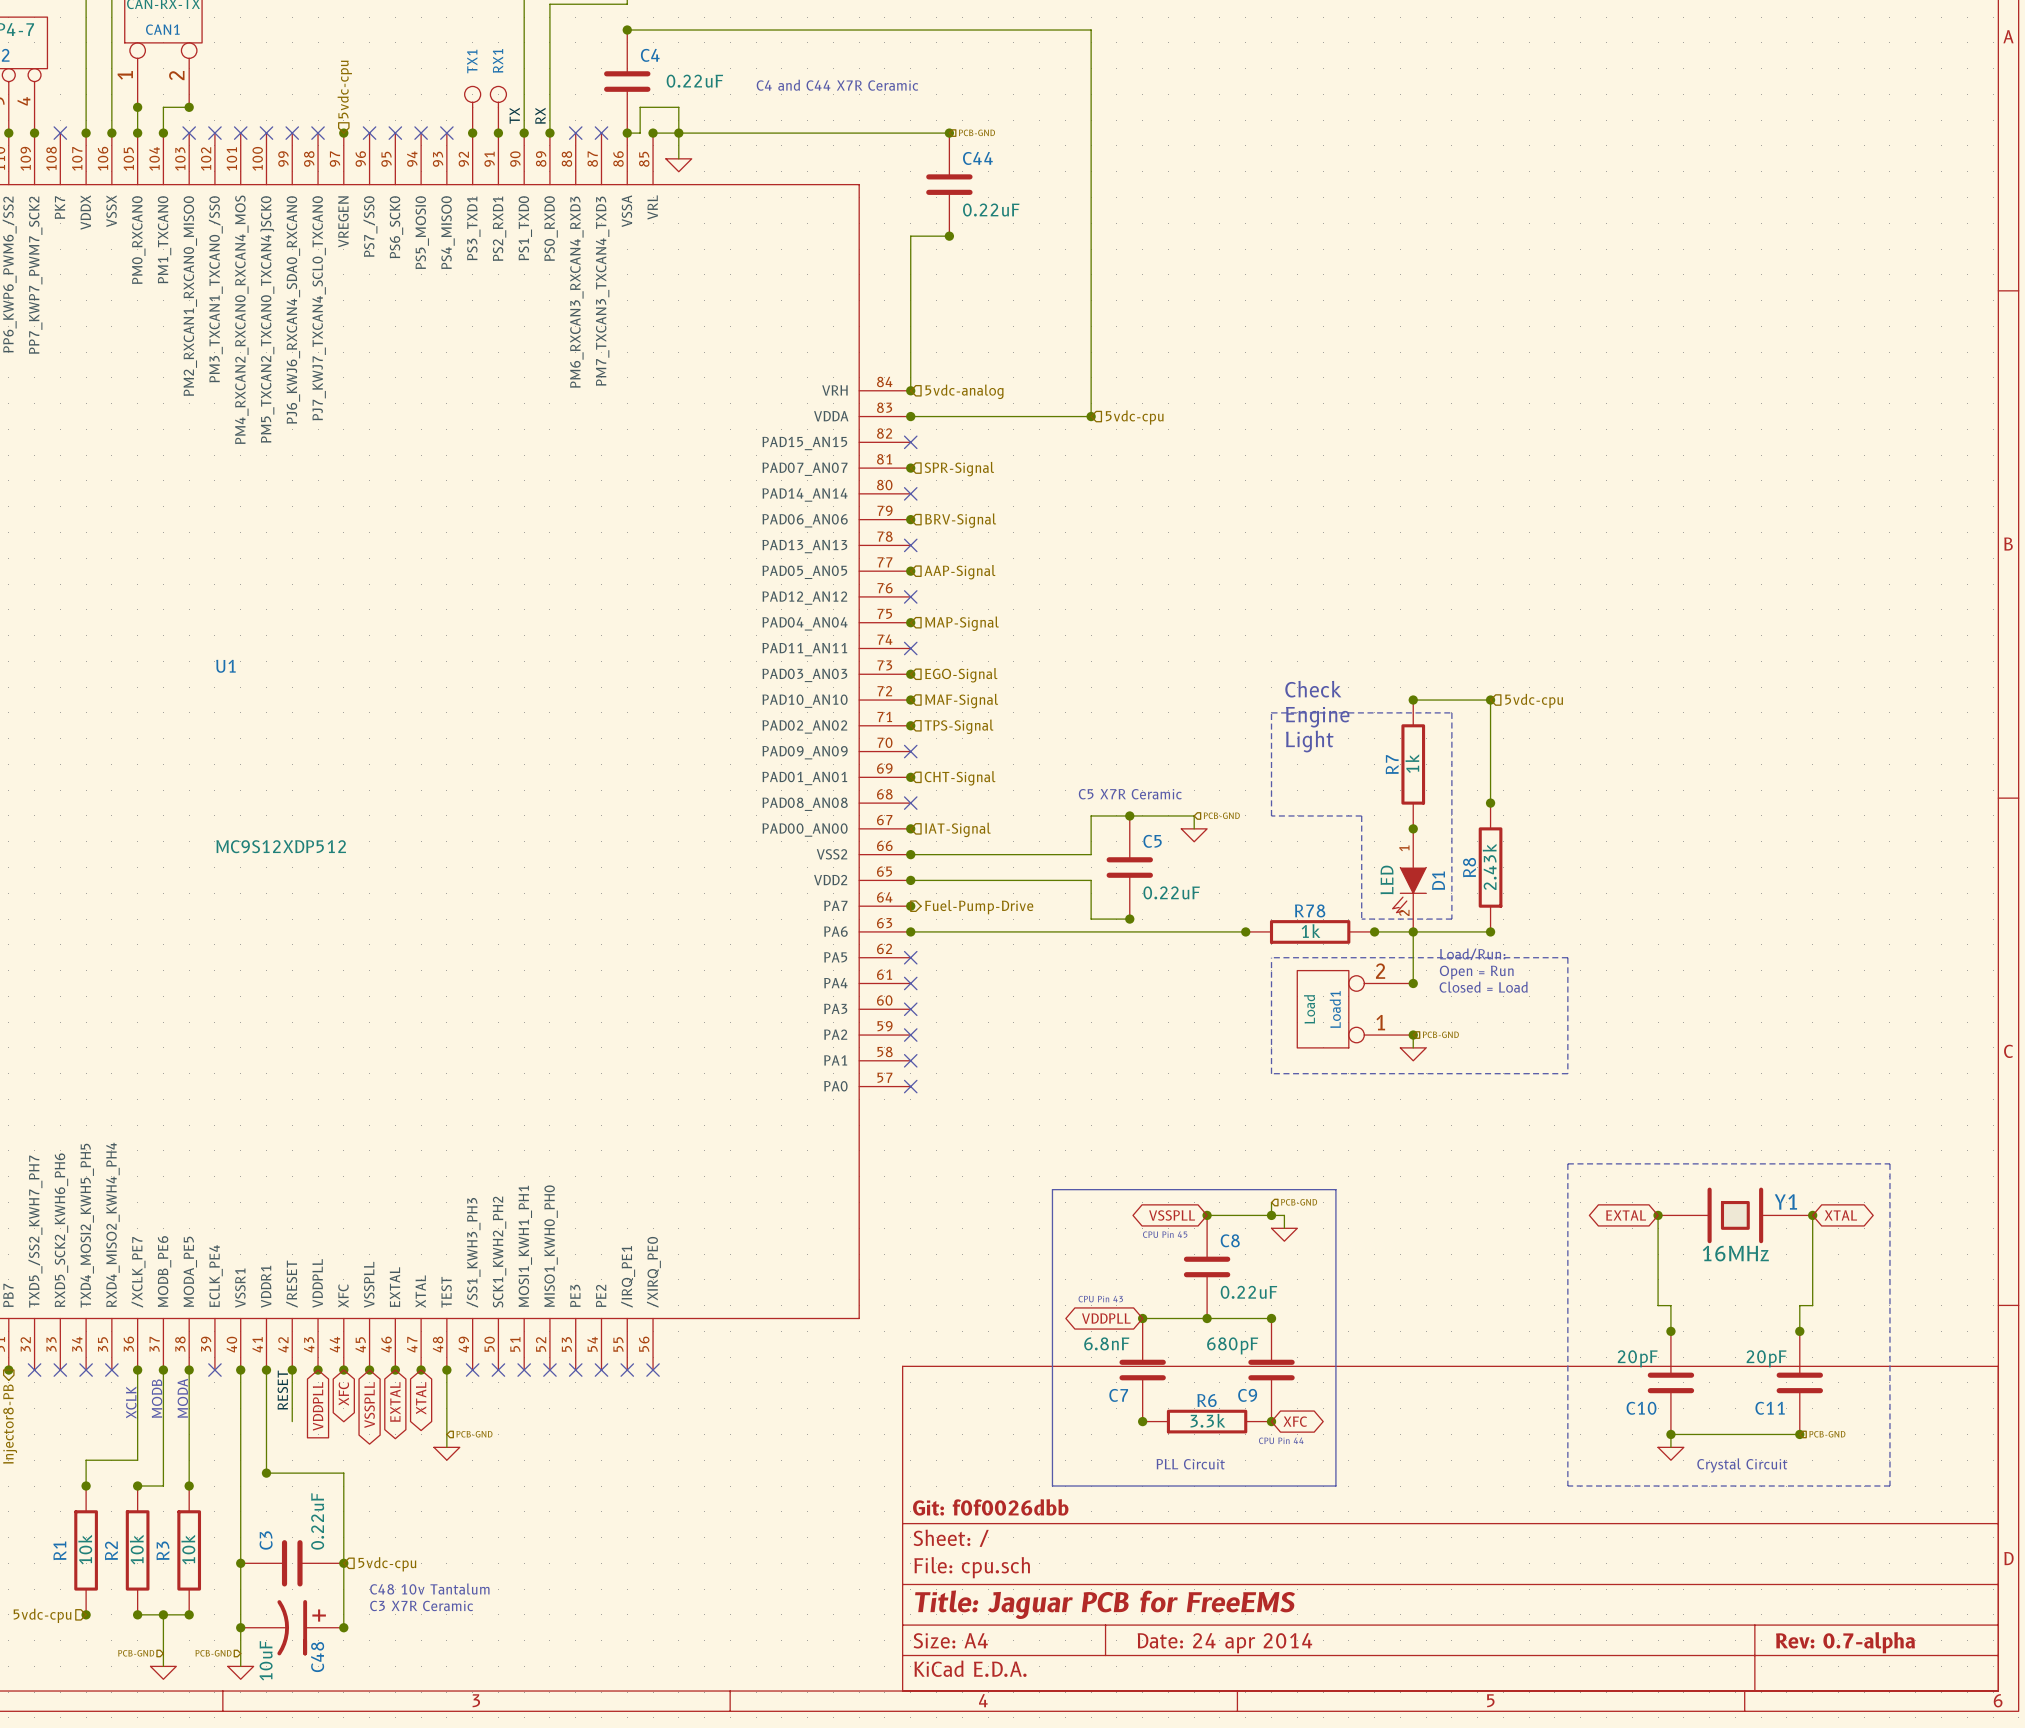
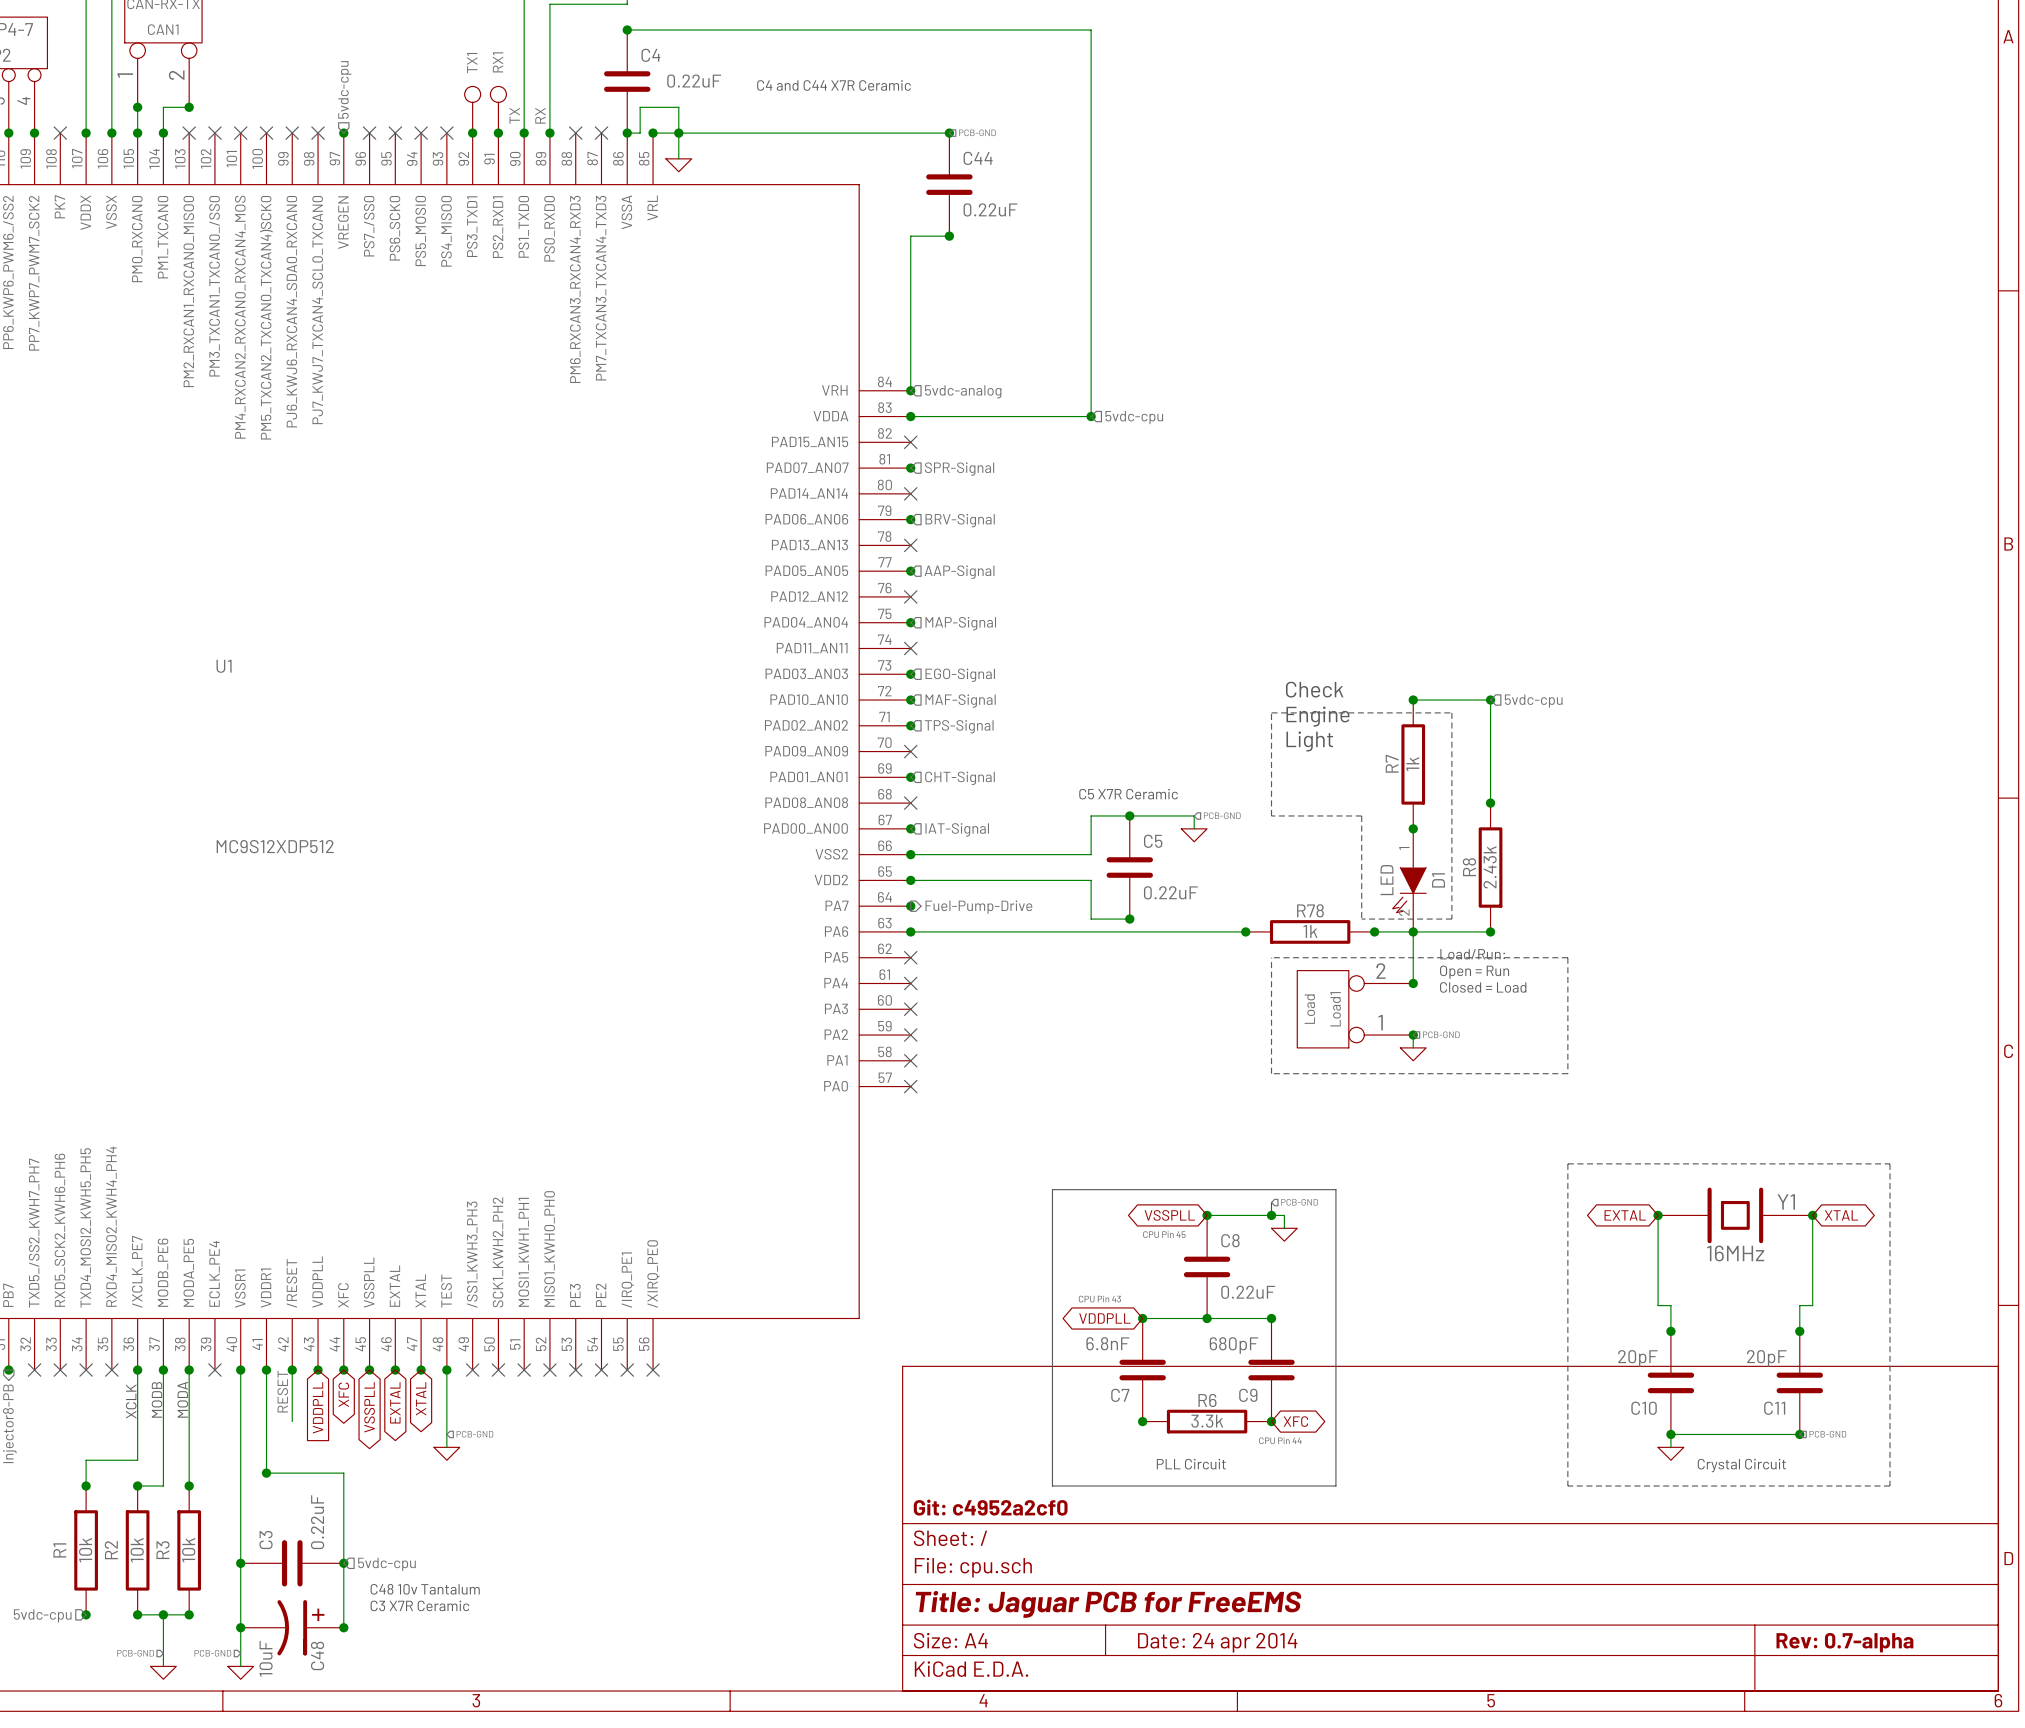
title block: Git: f0f0026dbb (990, 1507) -> Git: c4952a2cf0 (990, 1507)

